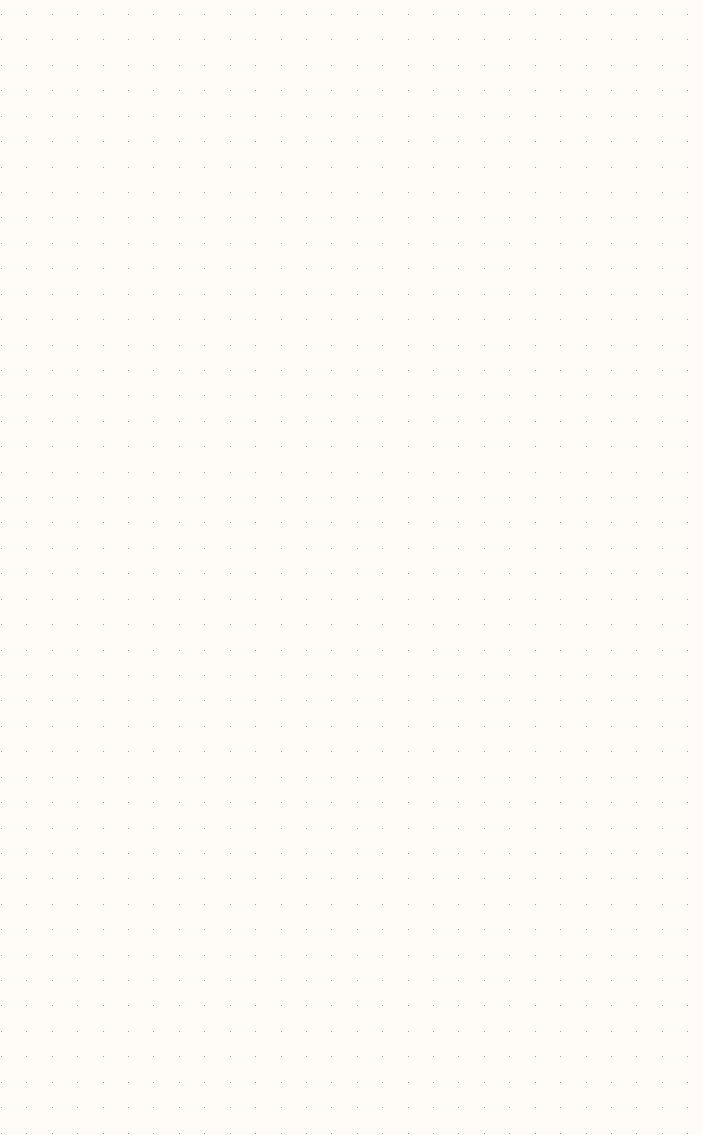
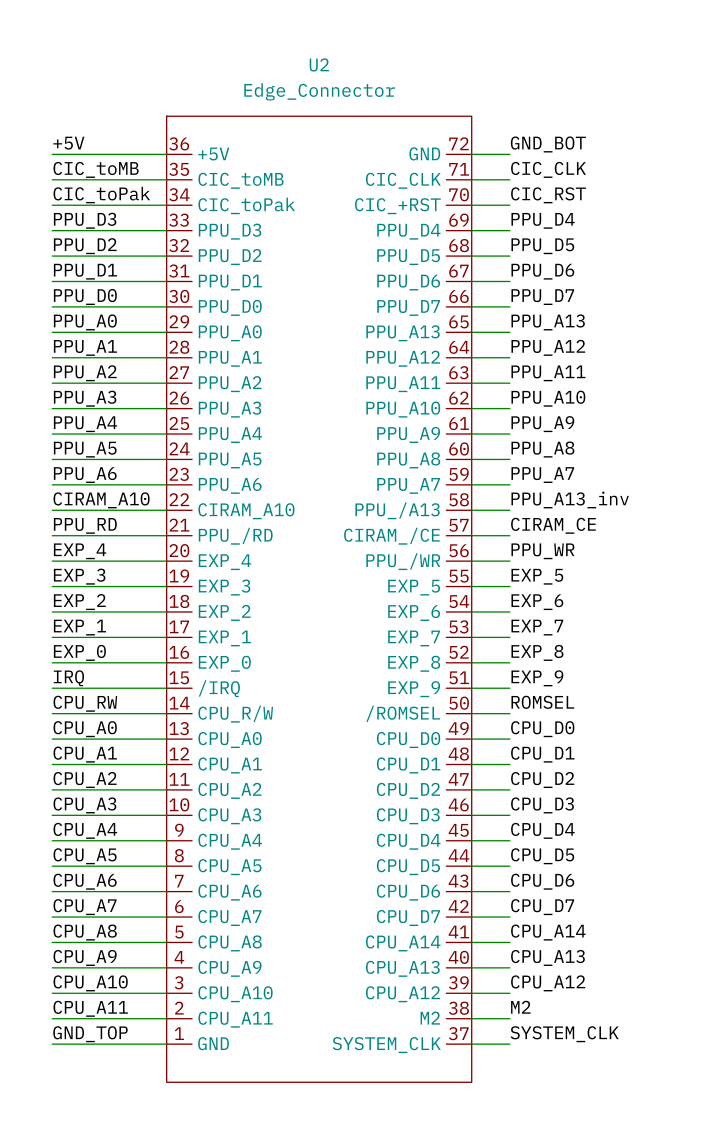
label: none -> +5V (68, 143)
label: none -> GND_BOT (548, 144)
wire: none -> (52, 154) (166, 154)
wire: none -> (471, 154) (509, 154)
label: none -> CIC_toMB (96, 169)
label: none -> CIC_CLK (548, 169)
wire: none -> (52, 179) (166, 179)
wire: none -> (471, 179) (509, 179)
label: none -> CIC_toPak (101, 195)
label: none -> CIC_RST (548, 195)
wire: none -> (52, 205) (166, 205)
wire: none -> (471, 205) (509, 205)
label: none -> PPU_D3 (85, 220)
label: none -> PPU_D4 (543, 220)
wire: none -> (52, 230) (166, 230)
wire: none -> (471, 230) (509, 230)
label: none -> PPU_D2 (85, 246)
label: none -> PPU_D5 (542, 246)
wire: none -> (52, 256) (166, 256)
wire: none -> (471, 256) (509, 256)
label: none -> PPU_D1 (85, 271)
label: none -> PPU_D6 (542, 271)
wire: none -> (52, 281) (166, 281)
wire: none -> (471, 281) (509, 281)
label: none -> PPU_D0 (85, 297)
label: none -> PPU_D7 (542, 297)
wire: none -> (52, 306) (166, 306)
wire: none -> (471, 306) (509, 306)
label: none -> PPU_A0 (85, 322)
label: none -> PPU_A13 (548, 322)
wire: none -> (52, 332) (166, 332)
wire: none -> (471, 332) (509, 332)
label: none -> PPU_A1 (85, 347)
label: none -> PPU_A12 (548, 347)
wire: none -> (52, 357) (166, 357)
wire: none -> (471, 357) (509, 357)
label: none -> PPU_A2 (85, 373)
label: none -> PPU_A11 (548, 373)
wire: none -> (52, 383) (166, 383)
wire: none -> (471, 383) (509, 383)
label: none -> PPU_A3 (85, 398)
label: none -> PPU_A10 (548, 398)
wire: none -> (52, 408) (166, 408)
wire: none -> (471, 408) (509, 408)
label: none -> PPU_A4 (85, 424)
label: none -> PPU_A9 (542, 424)
wire: none -> (52, 434) (166, 434)
wire: none -> (471, 434) (509, 434)
label: none -> PPU_A5 (85, 449)
label: none -> PPU_A8 (542, 449)
wire: none -> (52, 459) (166, 459)
wire: none -> (471, 459) (509, 459)
label: none -> PPU_A6 (85, 475)
label: none -> PPU_A7 (542, 475)
wire: none -> (52, 484) (166, 484)
wire: none -> (471, 484) (509, 484)
label: none -> CIRAM_A10 (101, 500)
label: none -> PPU_A13_inv (570, 500)
wire: none -> (52, 510) (166, 510)
wire: none -> (471, 510) (509, 510)
label: none -> PPU_RD (85, 525)
label: none -> CIRAM_CE (553, 525)
wire: none -> (52, 535) (166, 535)
wire: none -> (471, 535) (509, 535)
label: none -> EXP_4 (80, 551)
label: none -> PPU_WR (542, 551)
wire: none -> (52, 561) (166, 561)
wire: none -> (471, 561) (509, 561)
label: none -> EXP_3 (79, 576)
label: none -> EXP_5 (537, 576)
wire: none -> (52, 586) (166, 586)
wire: none -> (471, 586) (509, 586)
U2: none -> Edge_Connector (319, 599)
label: none -> EXP_2 (79, 602)
label: none -> EXP_6 (537, 602)
wire: none -> (52, 611) (166, 611)
wire: none -> (471, 611) (509, 611)
label: none -> EXP_1 (79, 627)
label: none -> EXP_7 (537, 627)
wire: none -> (52, 637) (166, 637)
wire: none -> (471, 637) (509, 637)
label: none -> EXP_0 (79, 652)
label: none -> EXP_8 (537, 652)
wire: none -> (52, 662) (166, 662)
wire: none -> (471, 662) (509, 662)
label: none -> IRQ (68, 678)
label: none -> EXP_9 (537, 678)
wire: none -> (52, 688) (166, 688)
wire: none -> (471, 688) (509, 688)
label: none -> ROMSEL (542, 702)
label: none -> CPU_RW (85, 703)
wire: none -> (52, 713) (166, 713)
wire: none -> (471, 713) (509, 713)
label: none -> CPU_A0 (85, 729)
label: none -> CPU_D0 (542, 729)
wire: none -> (52, 739) (166, 739)
wire: none -> (471, 739) (509, 739)
label: none -> CPU_A1 (85, 754)
label: none -> CPU_D1 (542, 754)
wire: none -> (52, 764) (166, 764)
wire: none -> (471, 764) (509, 764)
label: none -> CPU_A2 (85, 780)
label: none -> CPU_D2 (542, 780)
wire: none -> (52, 789) (166, 789)
wire: none -> (471, 789) (509, 789)
label: none -> CPU_A3 (84, 805)
label: none -> CPU_D3 (542, 805)
wire: none -> (52, 815) (166, 815)
wire: none -> (471, 815) (509, 815)
label: none -> CPU_A4 (85, 830)
label: none -> CPU_D4 (542, 830)
wire: none -> (52, 840) (166, 840)
wire: none -> (471, 840) (509, 840)
label: none -> CPU_A5 (85, 856)
label: none -> CPU_D5 (542, 856)
wire: none -> (52, 866) (166, 866)
wire: none -> (471, 866) (509, 866)
label: none -> CPU_A6 (85, 881)
label: none -> CPU_D6 (542, 881)
wire: none -> (52, 891) (166, 891)
wire: none -> (471, 891) (509, 891)
label: none -> CPU_A7 (85, 907)
label: none -> CPU_D7 (542, 907)
wire: none -> (52, 917) (166, 917)
wire: none -> (471, 917) (509, 917)
label: none -> CPU_A8 (85, 932)
label: none -> CPU_A14 (548, 932)
wire: none -> (52, 942) (166, 942)
wire: none -> (471, 942) (509, 942)
label: none -> CPU_A9 (85, 957)
label: none -> CPU_A13 (547, 957)
wire: none -> (52, 967) (166, 967)
wire: none -> (471, 967) (509, 967)
label: none -> CPU_A10 (90, 983)
label: none -> CPU_A12 (548, 983)
wire: none -> (52, 993) (166, 993)
wire: none -> (471, 993) (509, 993)
label: none -> M2 (520, 1007)
label: none -> CPU_A11 (90, 1008)
wire: none -> (52, 1018) (166, 1018)
wire: none -> (471, 1018) (509, 1018)
label: none -> GND_TOP (90, 1034)
label: none -> SYSTEM_CLK (564, 1034)
wire: none -> (52, 1044) (166, 1044)
wire: none -> (471, 1044) (509, 1044)

